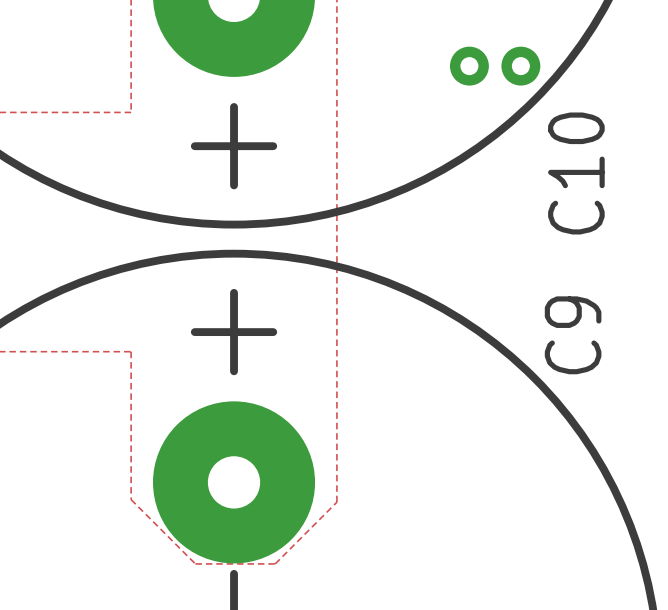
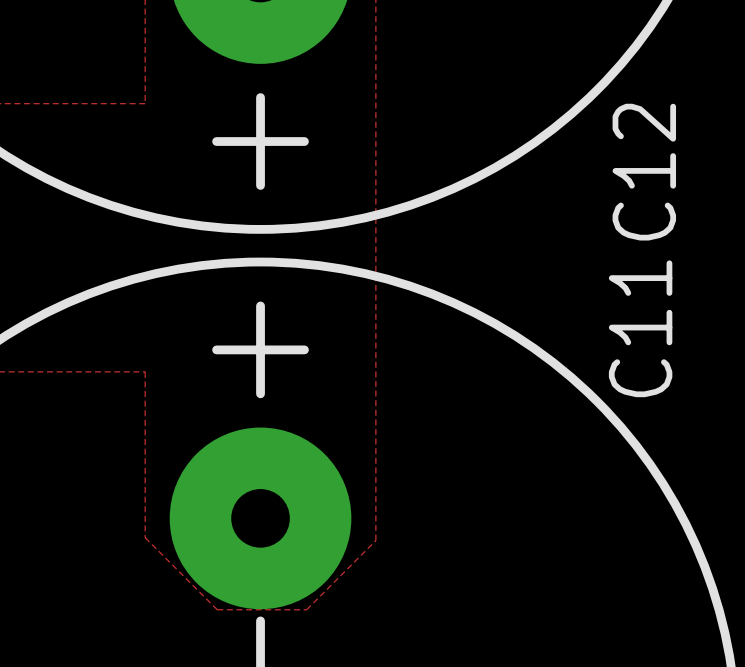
via: (469, 66) -> none
via: (520, 66) -> none
C10 name: C10 (576, 173) -> C12 (644, 172)
C9 name: C9 (573, 335) -> C11 (640, 328)

